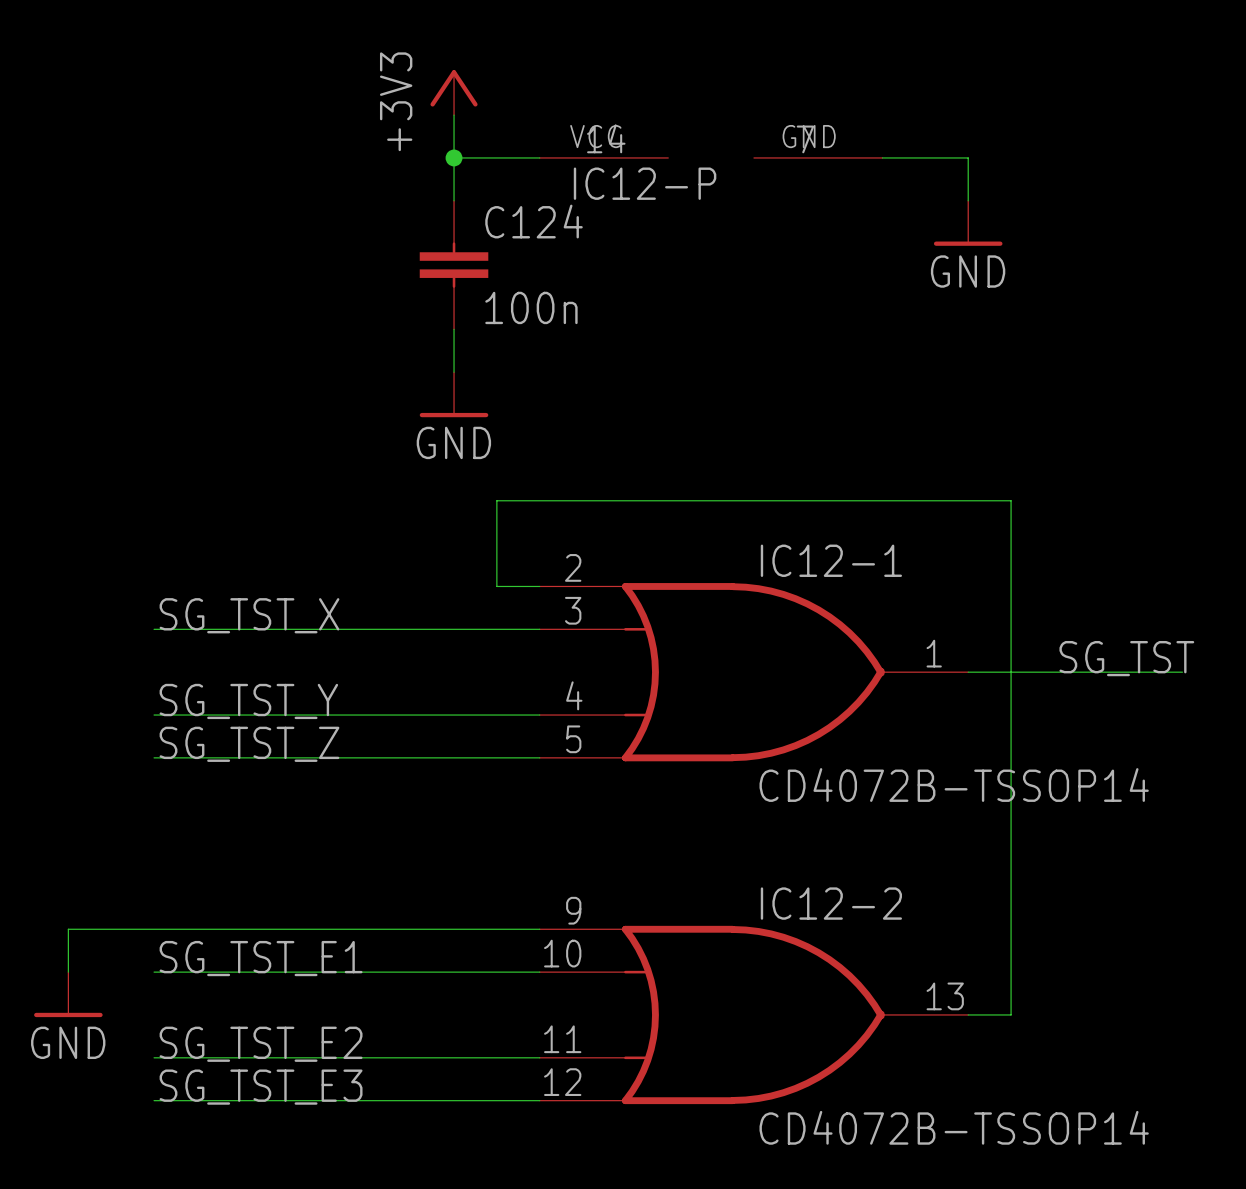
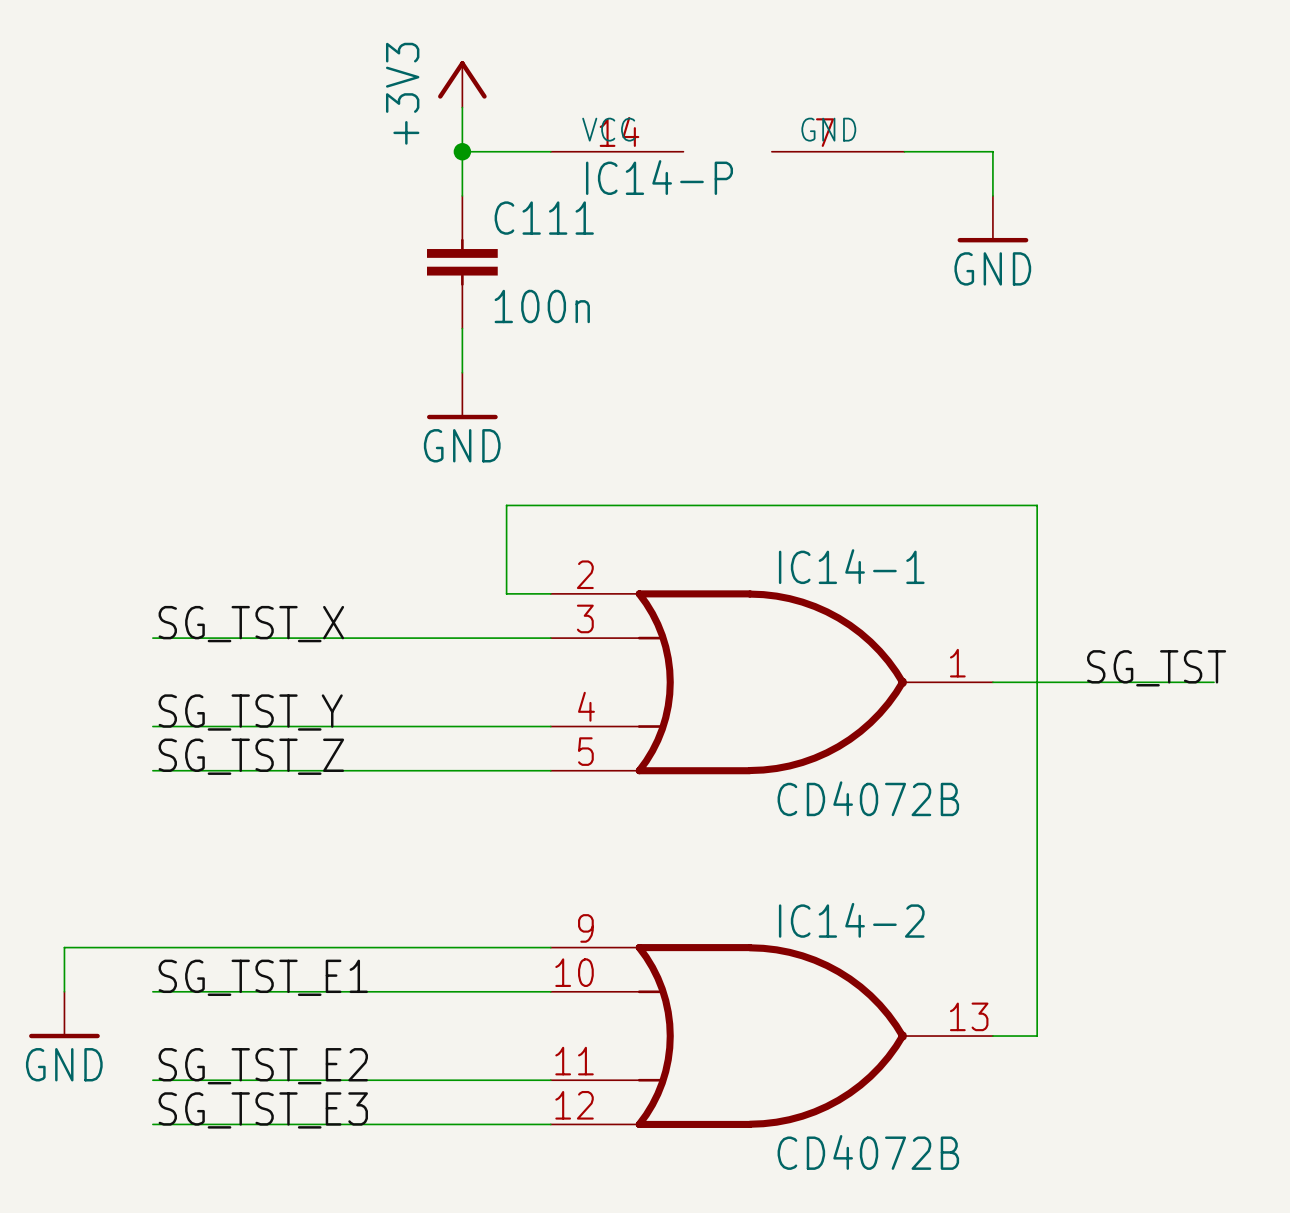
IC12-P name: IC12-P (645, 183) -> IC14-P (659, 177)
C124 name: C124 (534, 221) -> C111 (544, 218)
IC12-1 name: IC12-1 (831, 560) -> IC14-1 (851, 566)
IC12-1 value: CD4072B-TSSOP14 (954, 785) -> CD4072B (868, 798)
IC12-2 name: IC12-2 (831, 903) -> IC14-2 (851, 920)
IC12-2 value: CD4072B-TSSOP14 (954, 1127) -> CD4072B (868, 1152)

